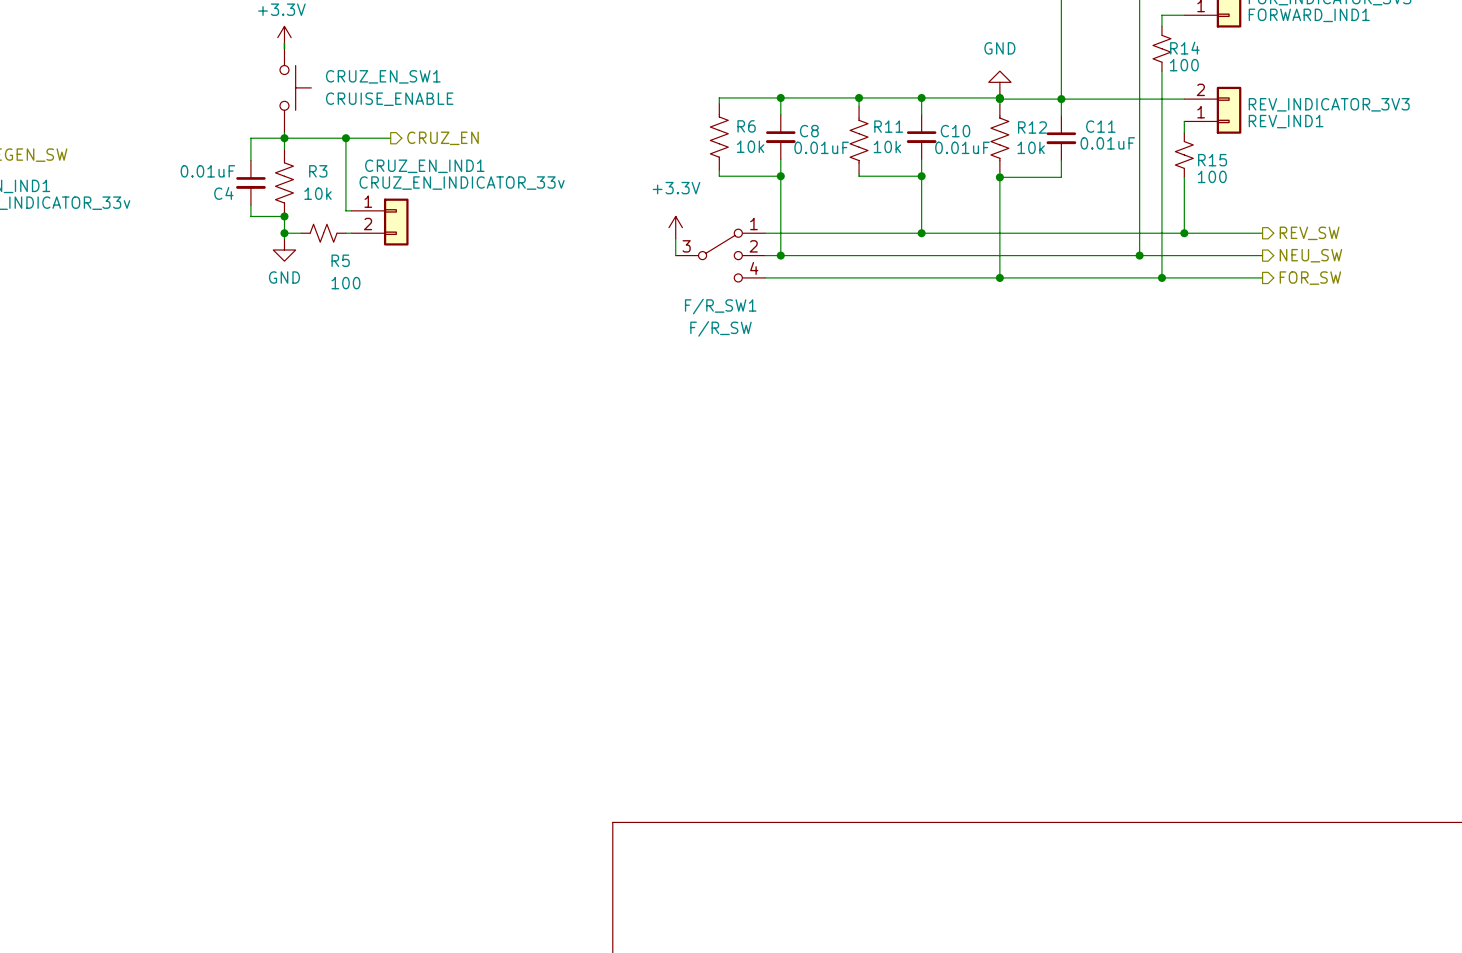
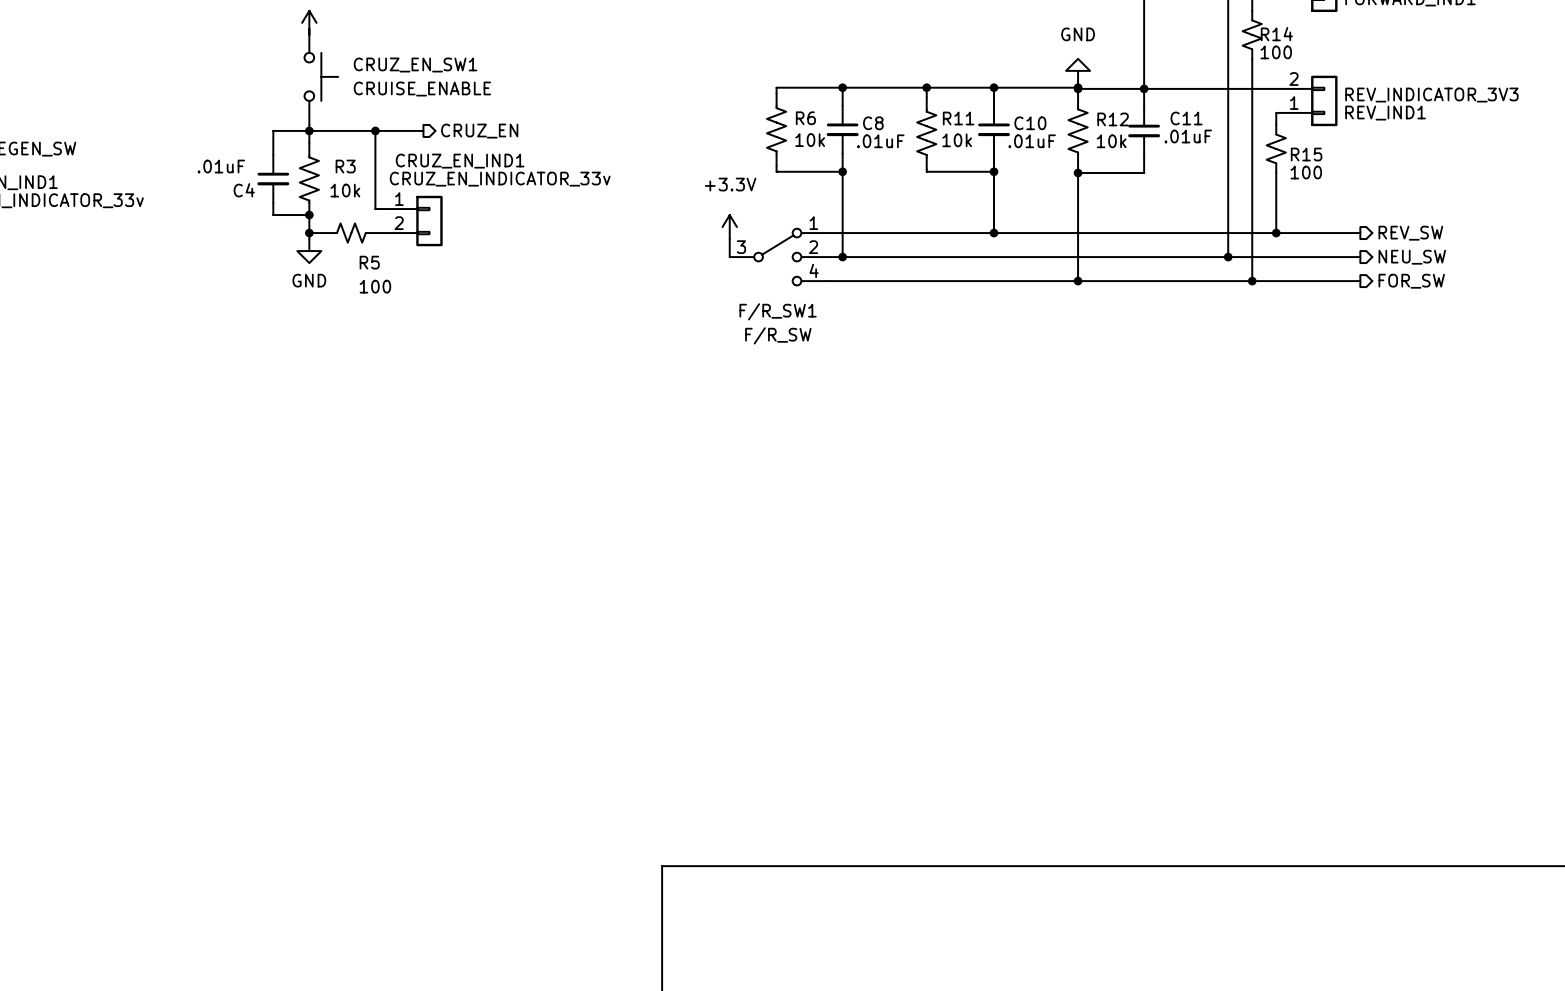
C11 value: 0.01uF (1107, 143) -> .01uF (1188, 136)
C8 value: 0.01uF (821, 147) -> .01uF (880, 141)
C10 value: 0.01uF (962, 147) -> .01uF (1032, 141)
C4 value: 0.01uF (207, 171) -> .01uF (221, 166)

